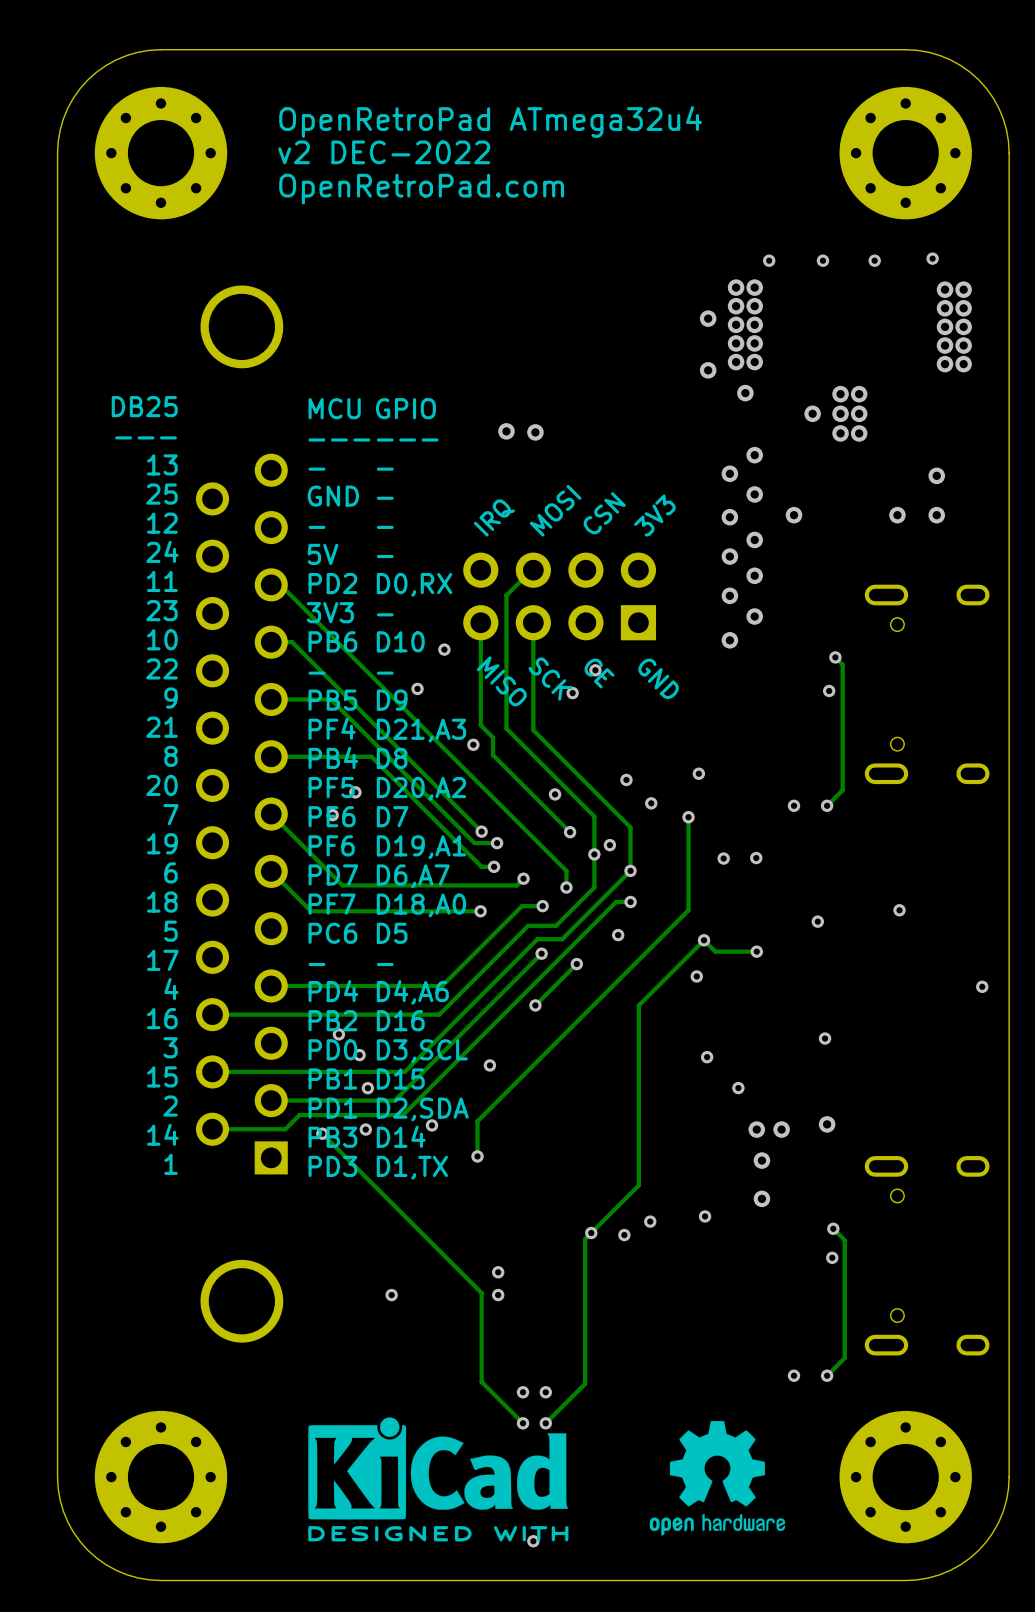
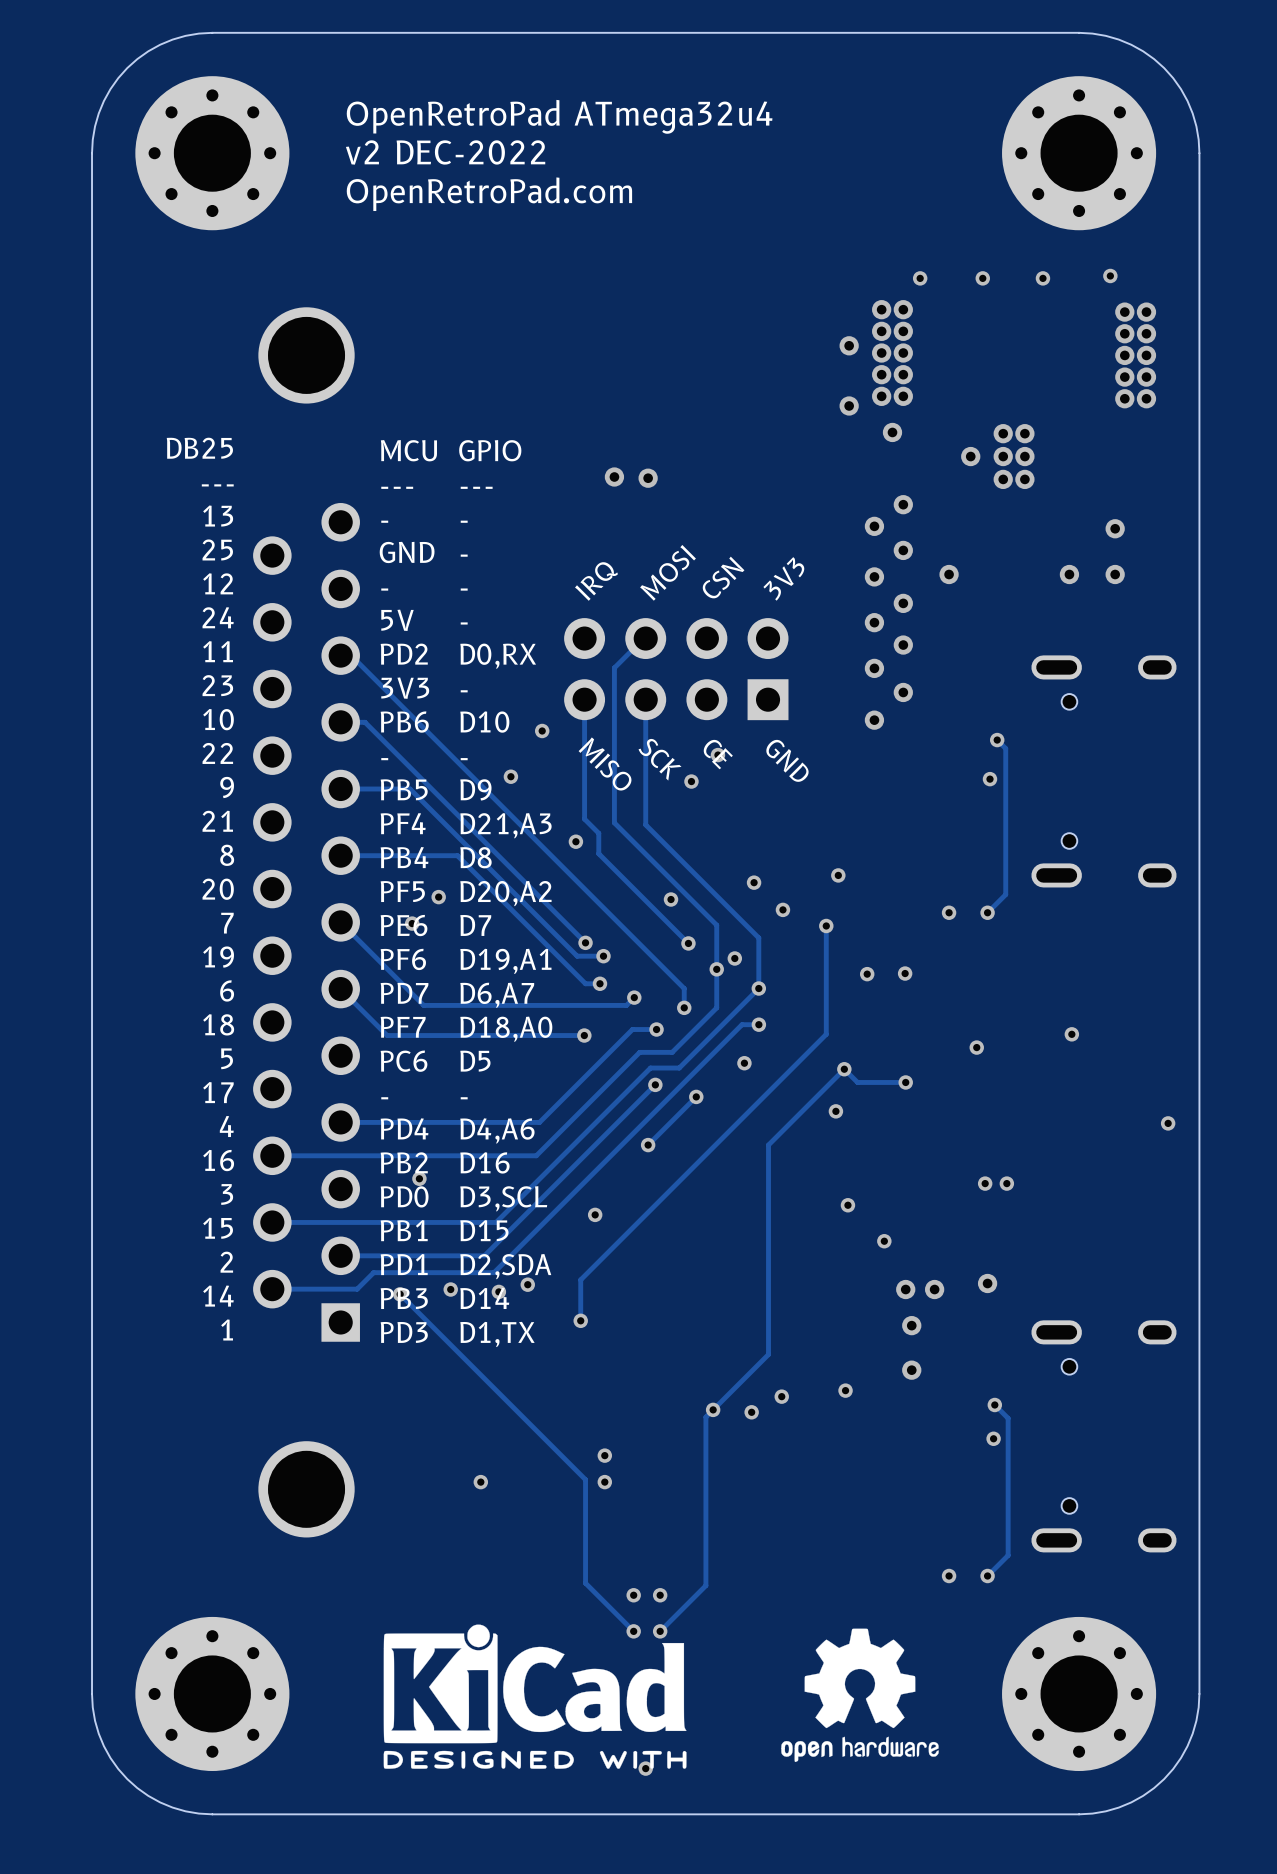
via: none -> (1006, 1183)
via: (359, 1055) -> none
via: (367, 1088) -> none
via: none -> (498, 1291)

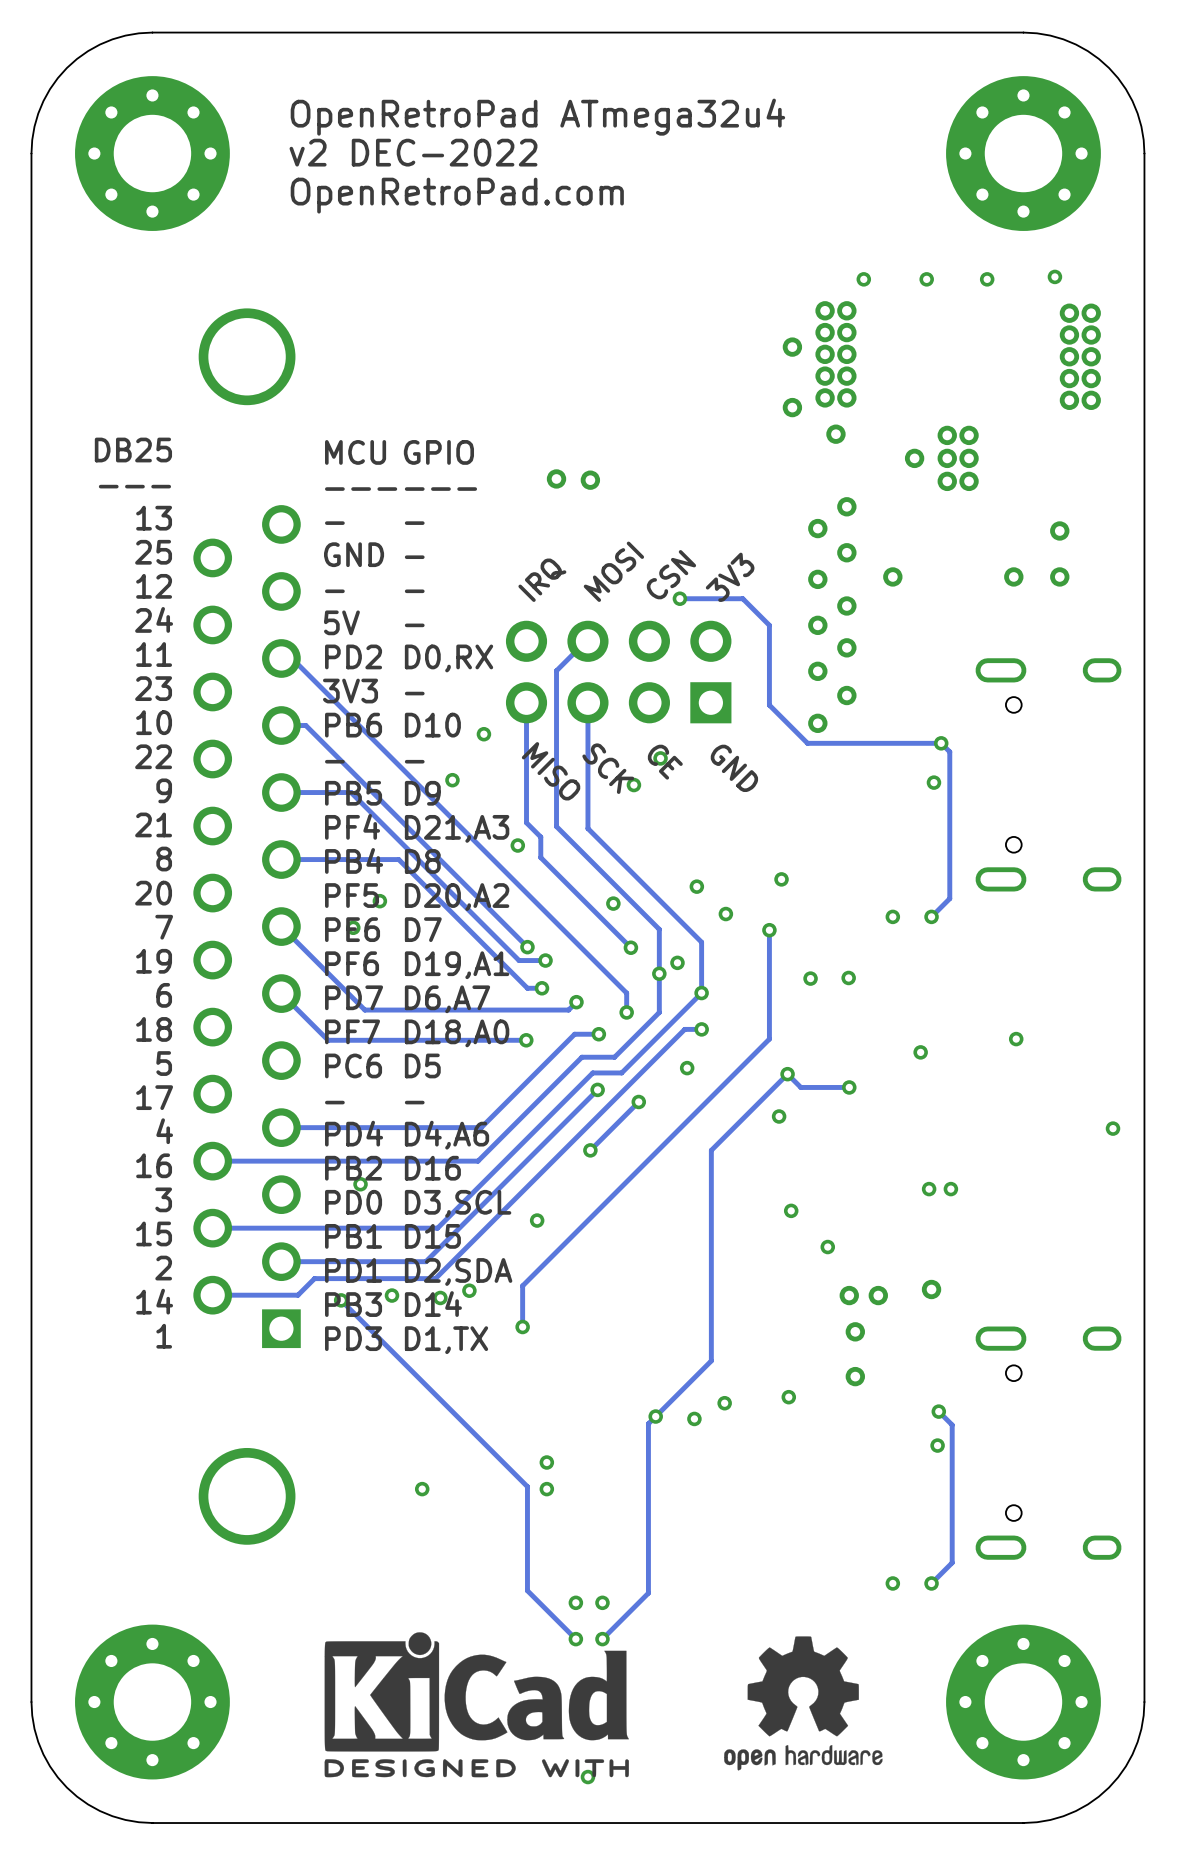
track: none -> (679, 598) (742, 598) (769, 625) (769, 705) (807, 743) (941, 743)
via: none -> (679, 598)

